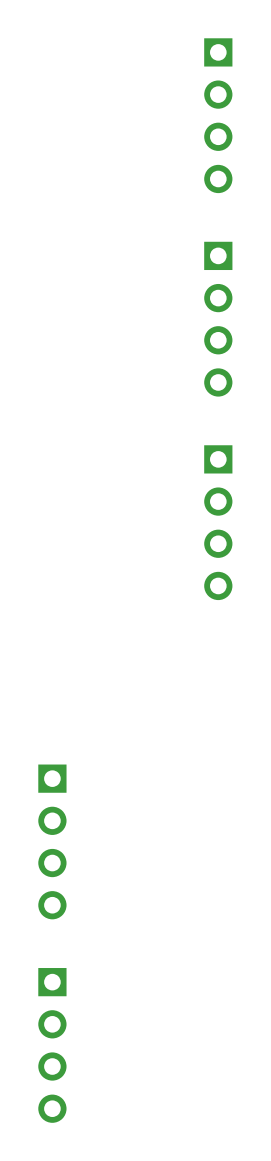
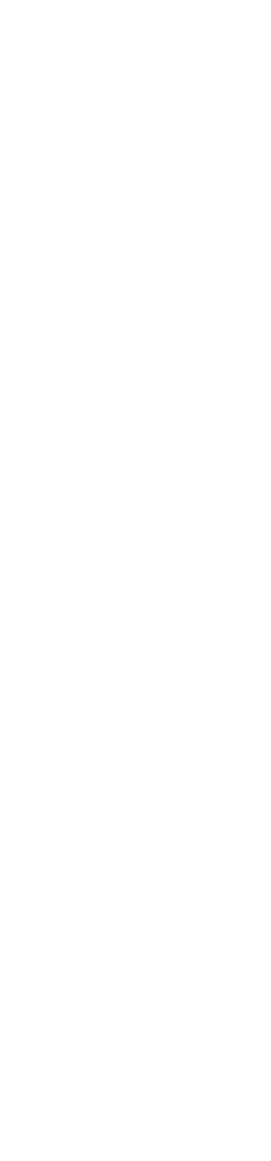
part: (218, 115) -> none
part: (218, 319) -> none
part: (218, 522) -> none
part: (52, 841) -> none
part: (52, 1045) -> none

